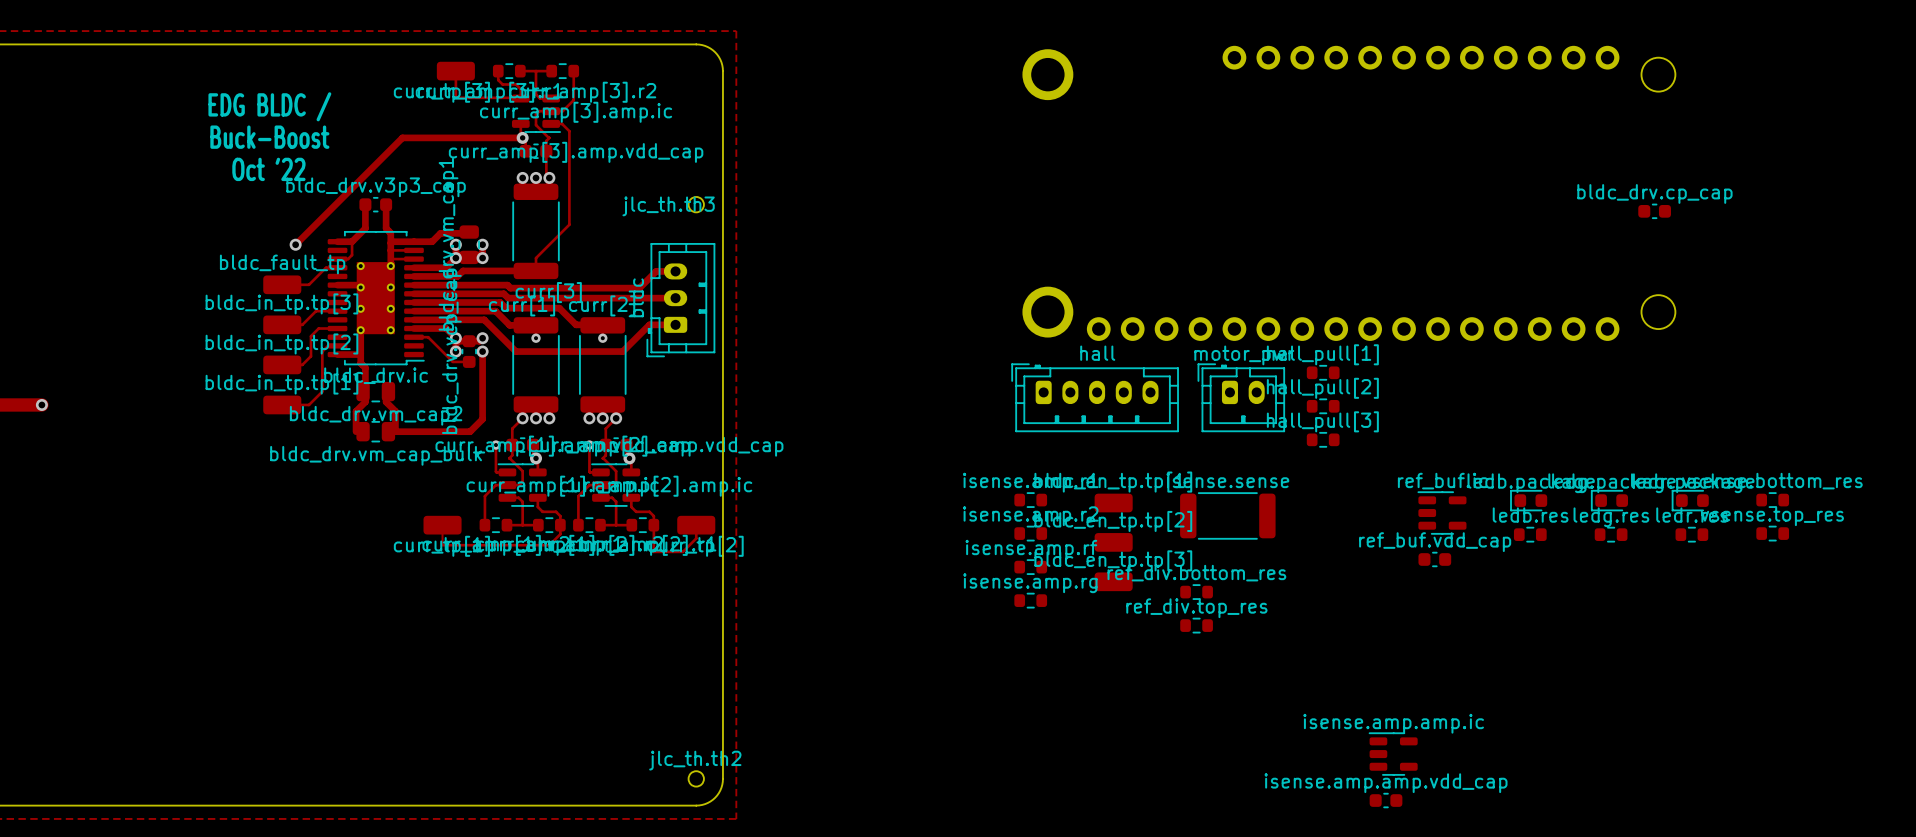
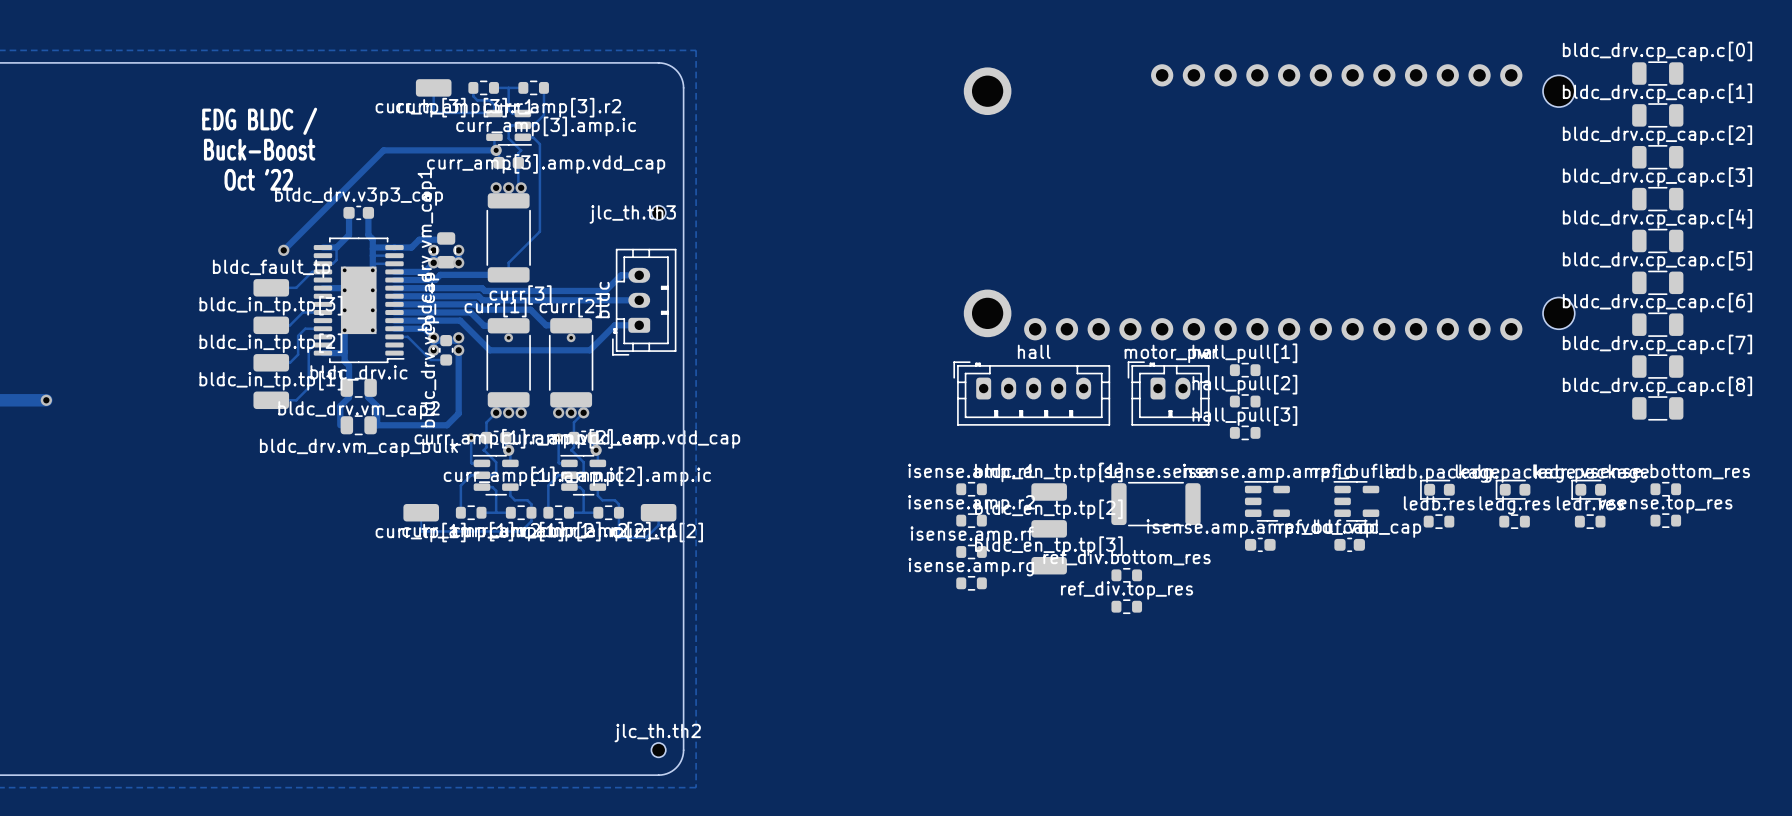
bldc_drv.cp_cap.c[0]: none -> (1657, 73)
bldc_drv.cp_cap.c[1]: none -> (1657, 115)
bldc_drv.cp_cap.c[2]: none -> (1657, 157)
bldc_drv.cp_cap.c[3]: none -> (1657, 199)
bldc_drv.cp_cap: (1654, 211) -> none
bldc_drv.cp_cap.c[4]: none -> (1657, 240)
bldc_drv.cp_cap.c[5]: none -> (1657, 282)
bldc_drv.cp_cap.c[6]: none -> (1657, 324)
bldc_drv.cp_cap.c[7]: none -> (1657, 366)
bldc_drv.cp_cap.c[8]: none -> (1657, 408)
isense.amp.amp.ic position: (1393, 754) -> (1267, 501)
isense.amp.amp.vdd_cap position: (1386, 800) -> (1260, 544)

